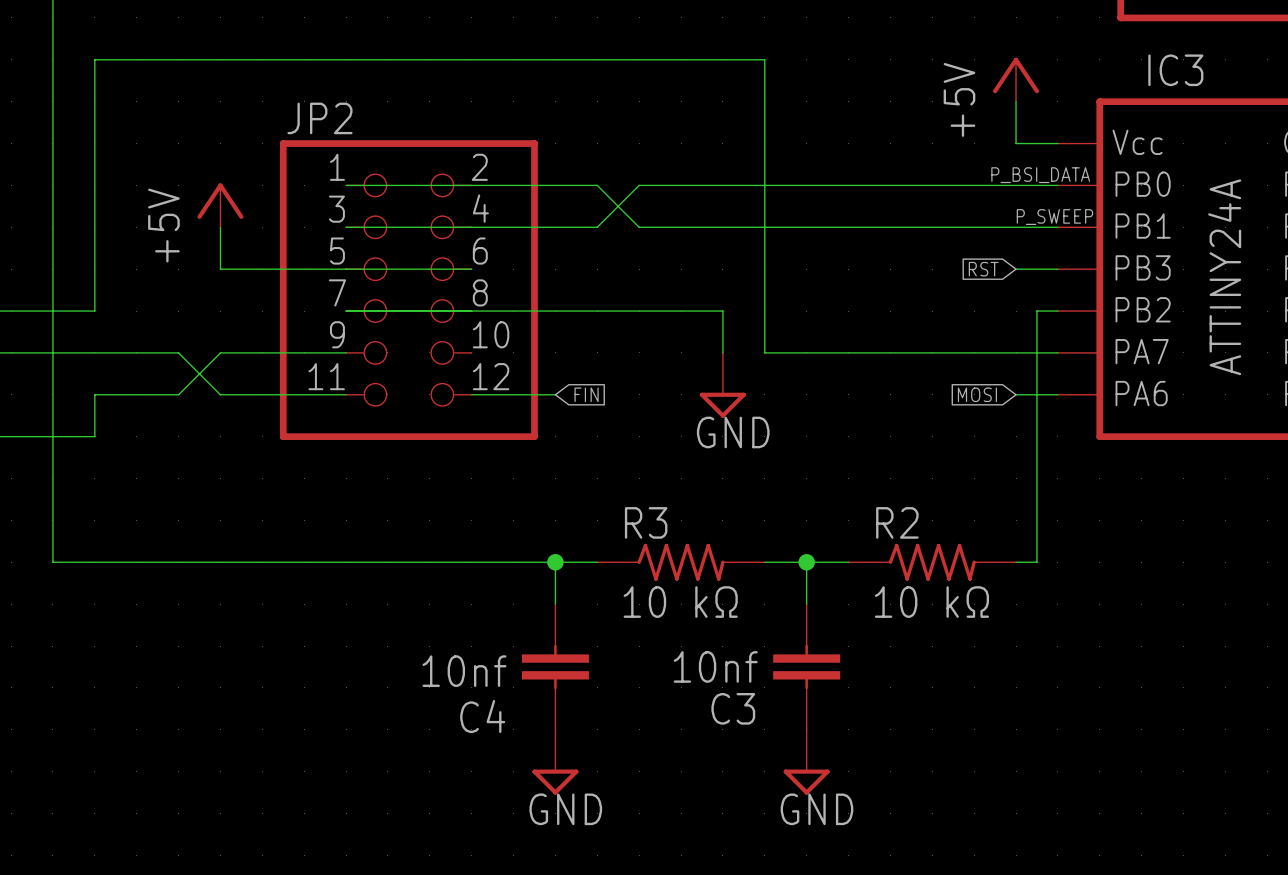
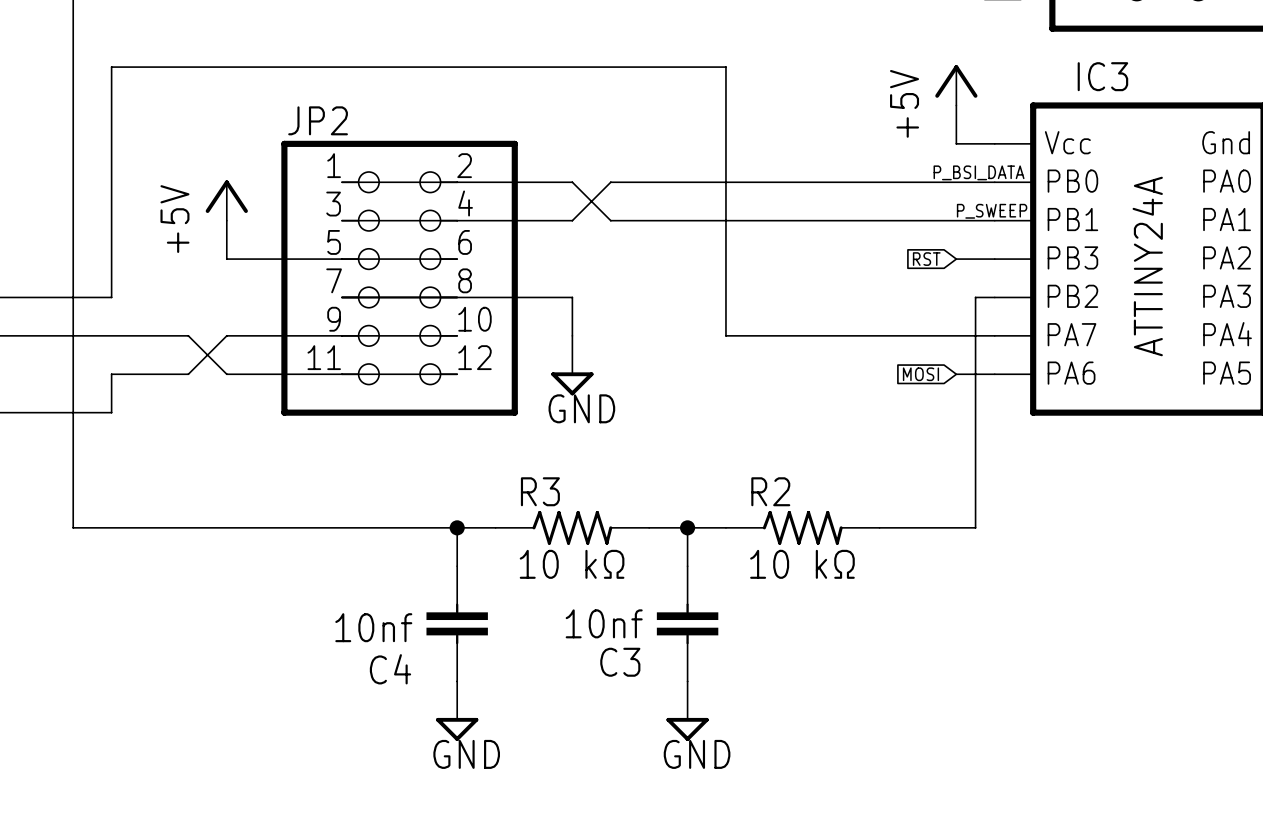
wire: (597, 311) (722, 311) (722, 352) -> (572, 297) (572, 335)
wire: none -> (342, 335) (457, 335)
power symbol position: GND (722, 385) -> GND (572, 365)
wire: (471, 394) (555, 394) -> (457, 374) (342, 374)
global label: FIN (586, 394) -> none
junction: none -> (457, 527)
wire: (555, 562) (555, 604) -> (457, 527) (457, 566)
junction: (555, 562) -> none
R3 position: (681, 562) -> (572, 527)
junction: none -> (687, 527)
wire: (806, 562) (806, 604) -> (687, 527) (687, 566)
junction: (806, 562) -> none
R2 position: (932, 562) -> (802, 527)
C4 position: (555, 666) -> (457, 623)
C3 position: (806, 666) -> (687, 623)
power symbol: none -> GND (457, 711)
power symbol: GND (555, 762) -> none
power symbol: none -> GND (687, 711)
power symbol: GND (806, 762) -> none

